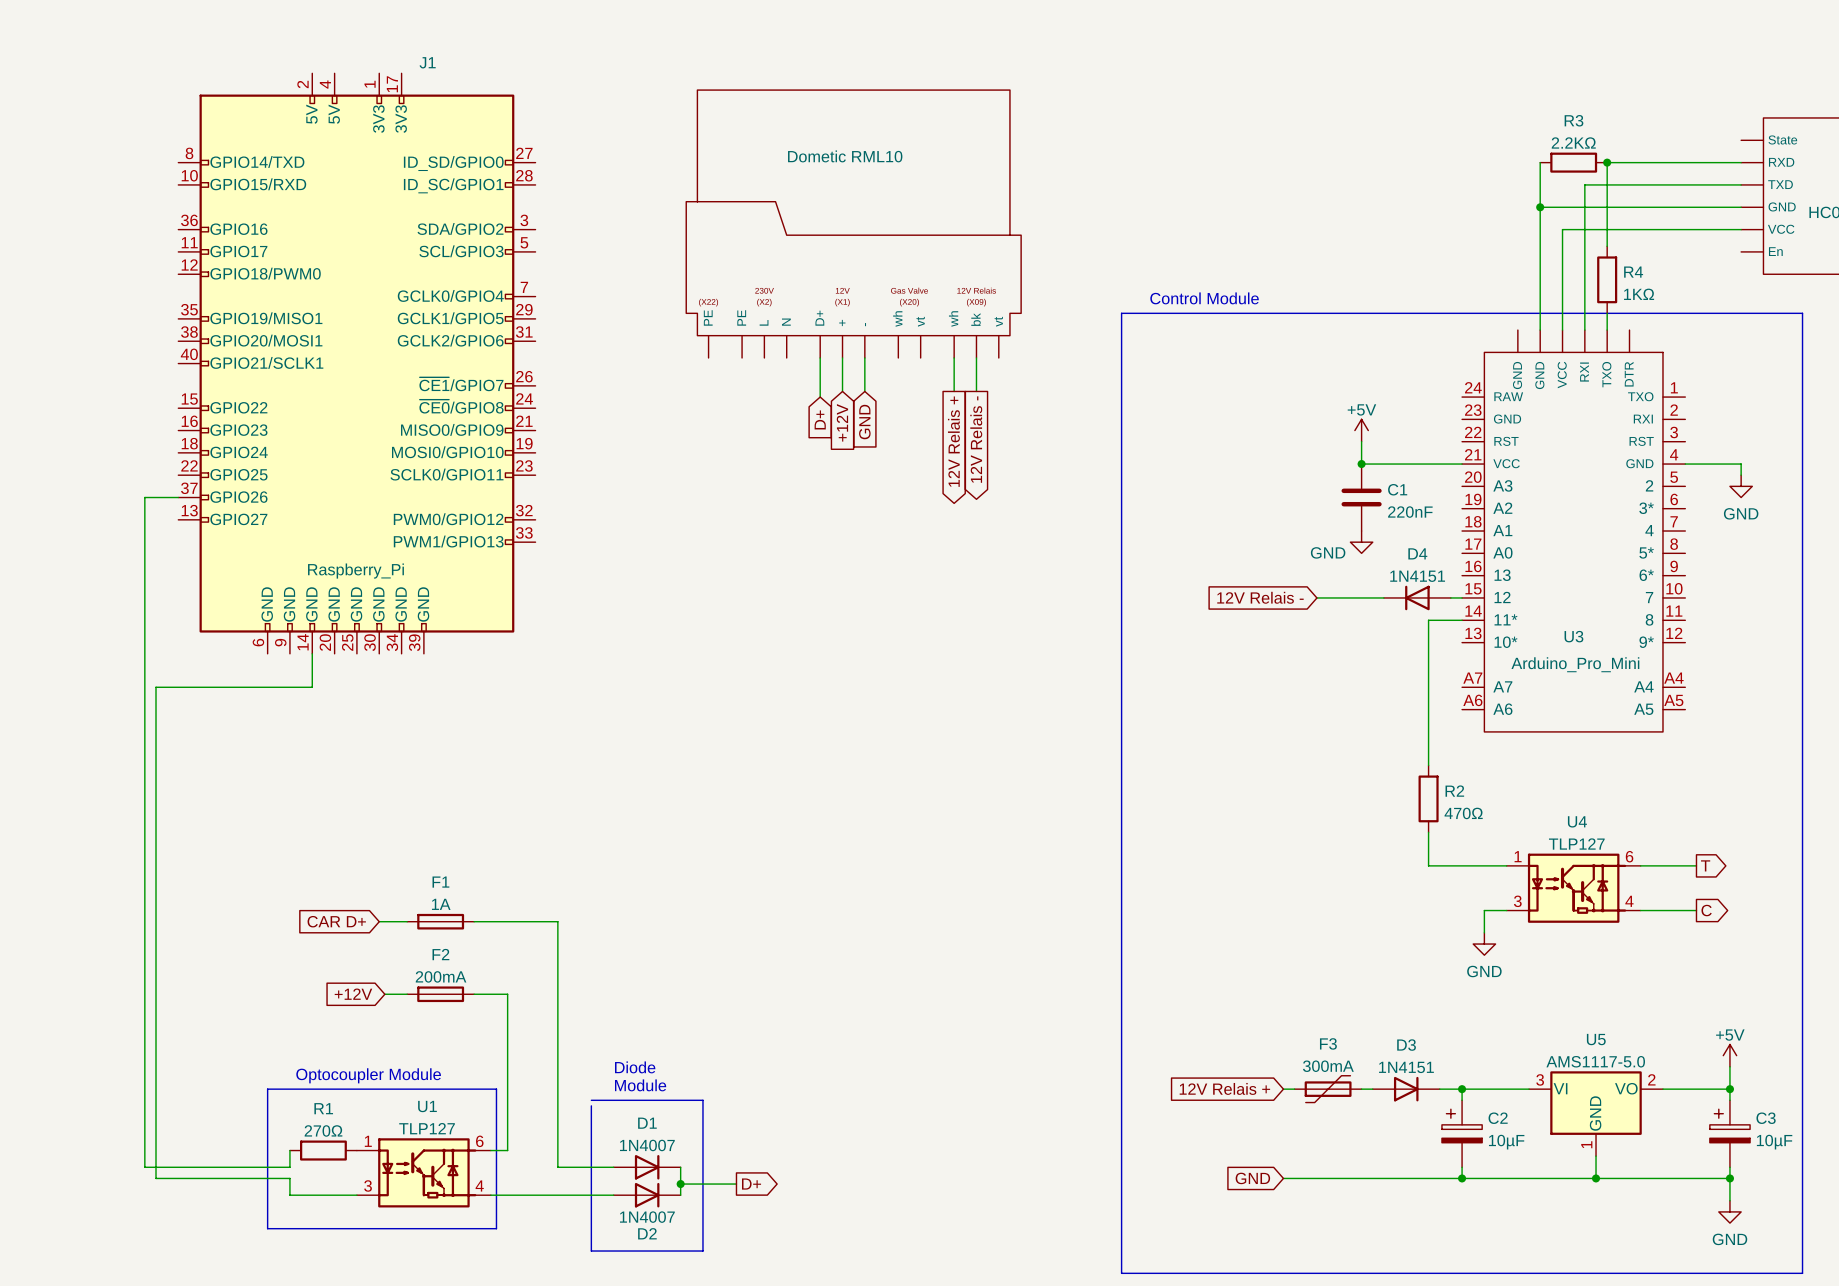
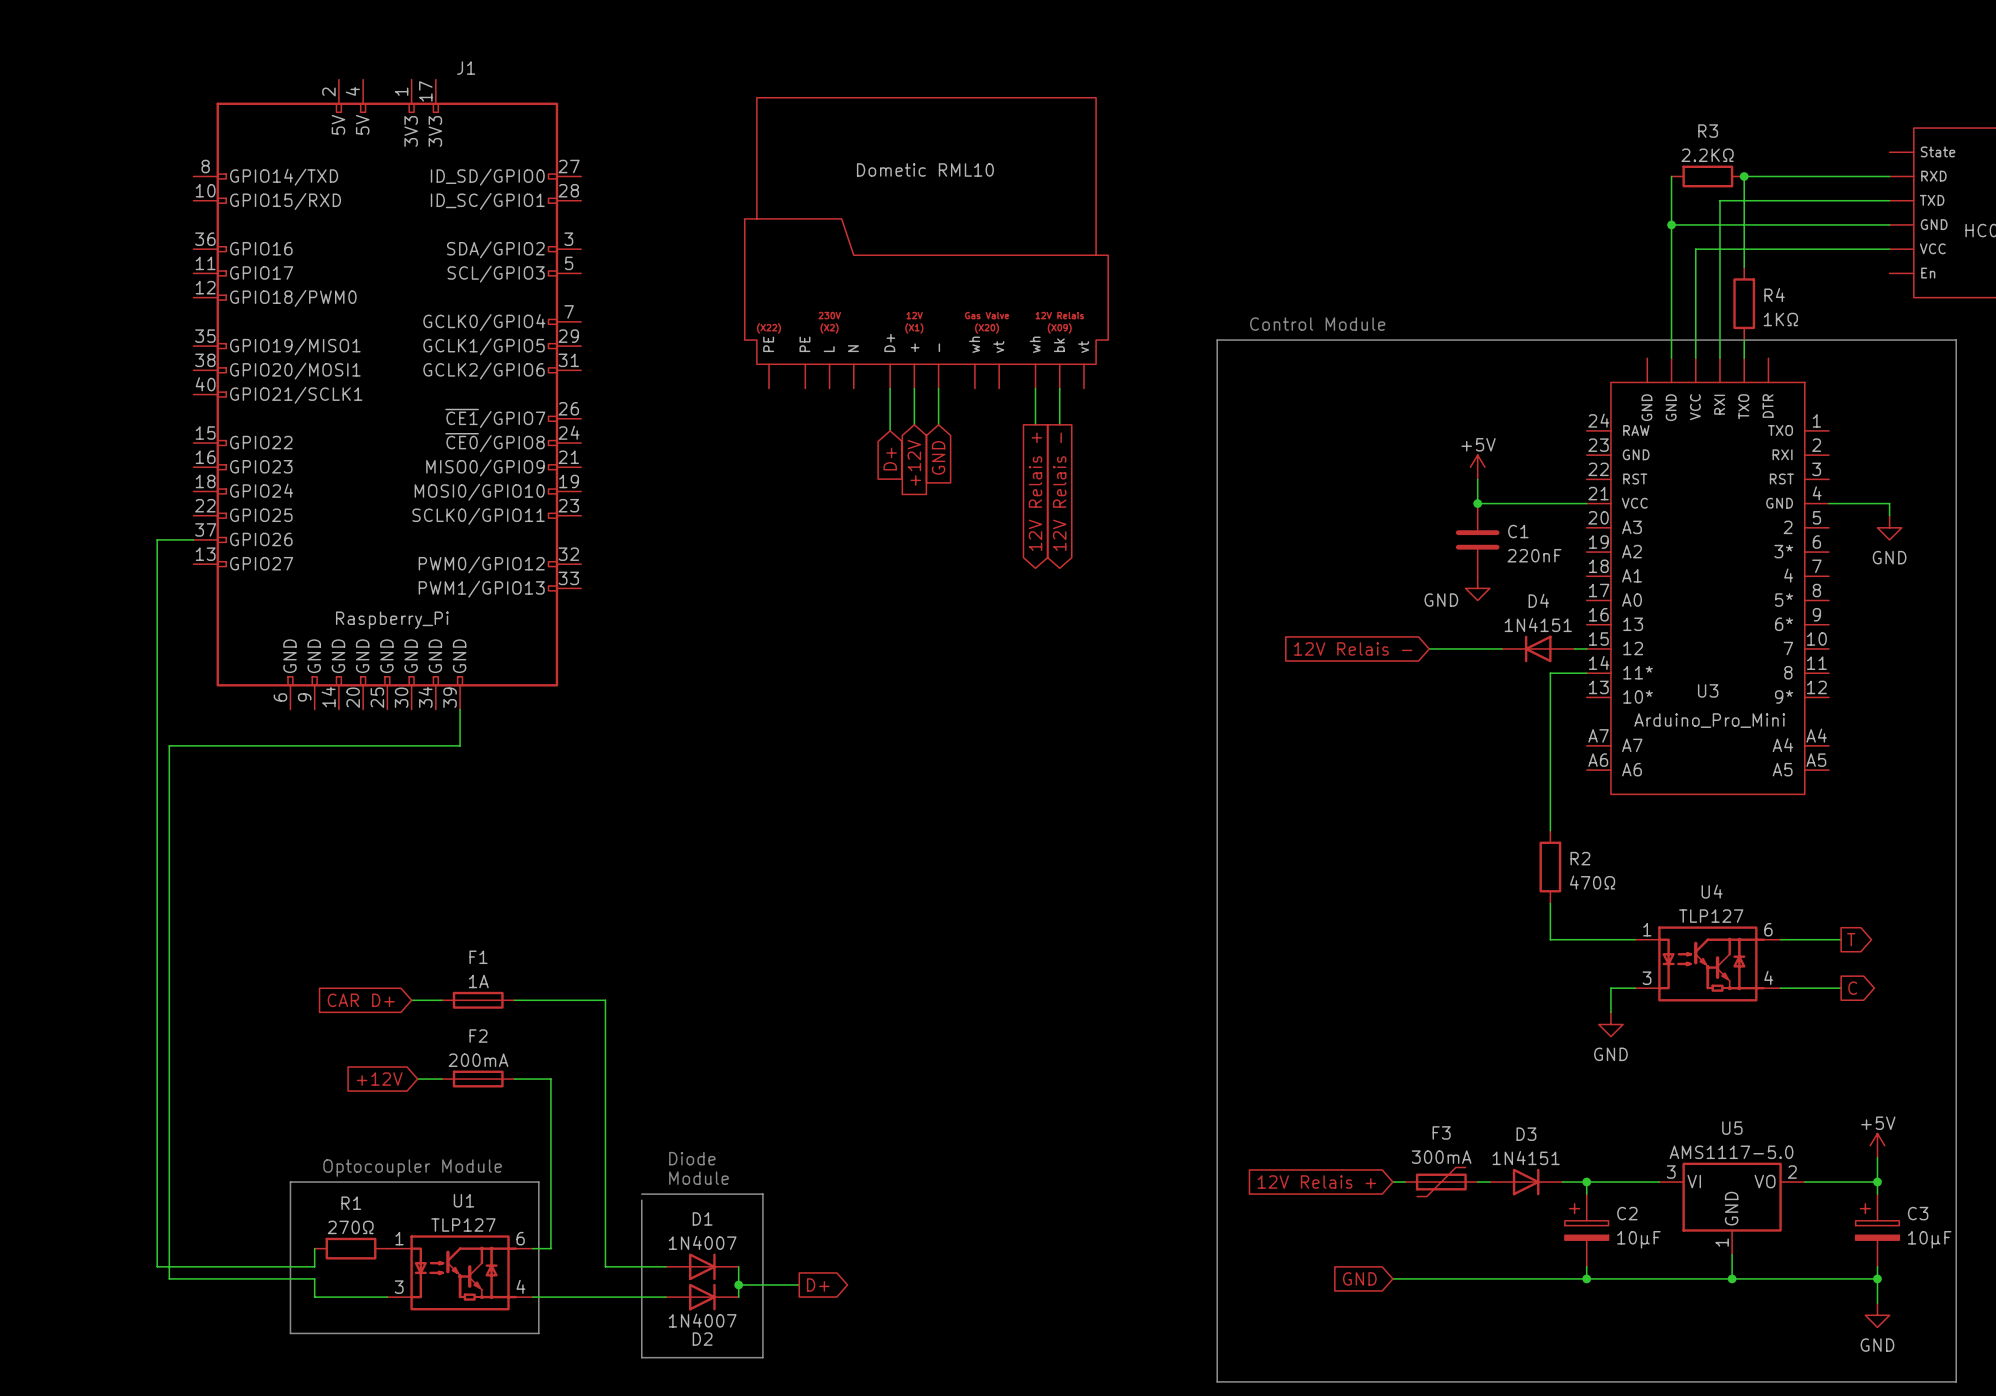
wire: (312, 653) (312, 687) -> (460, 709) (460, 745) (338, 745)

